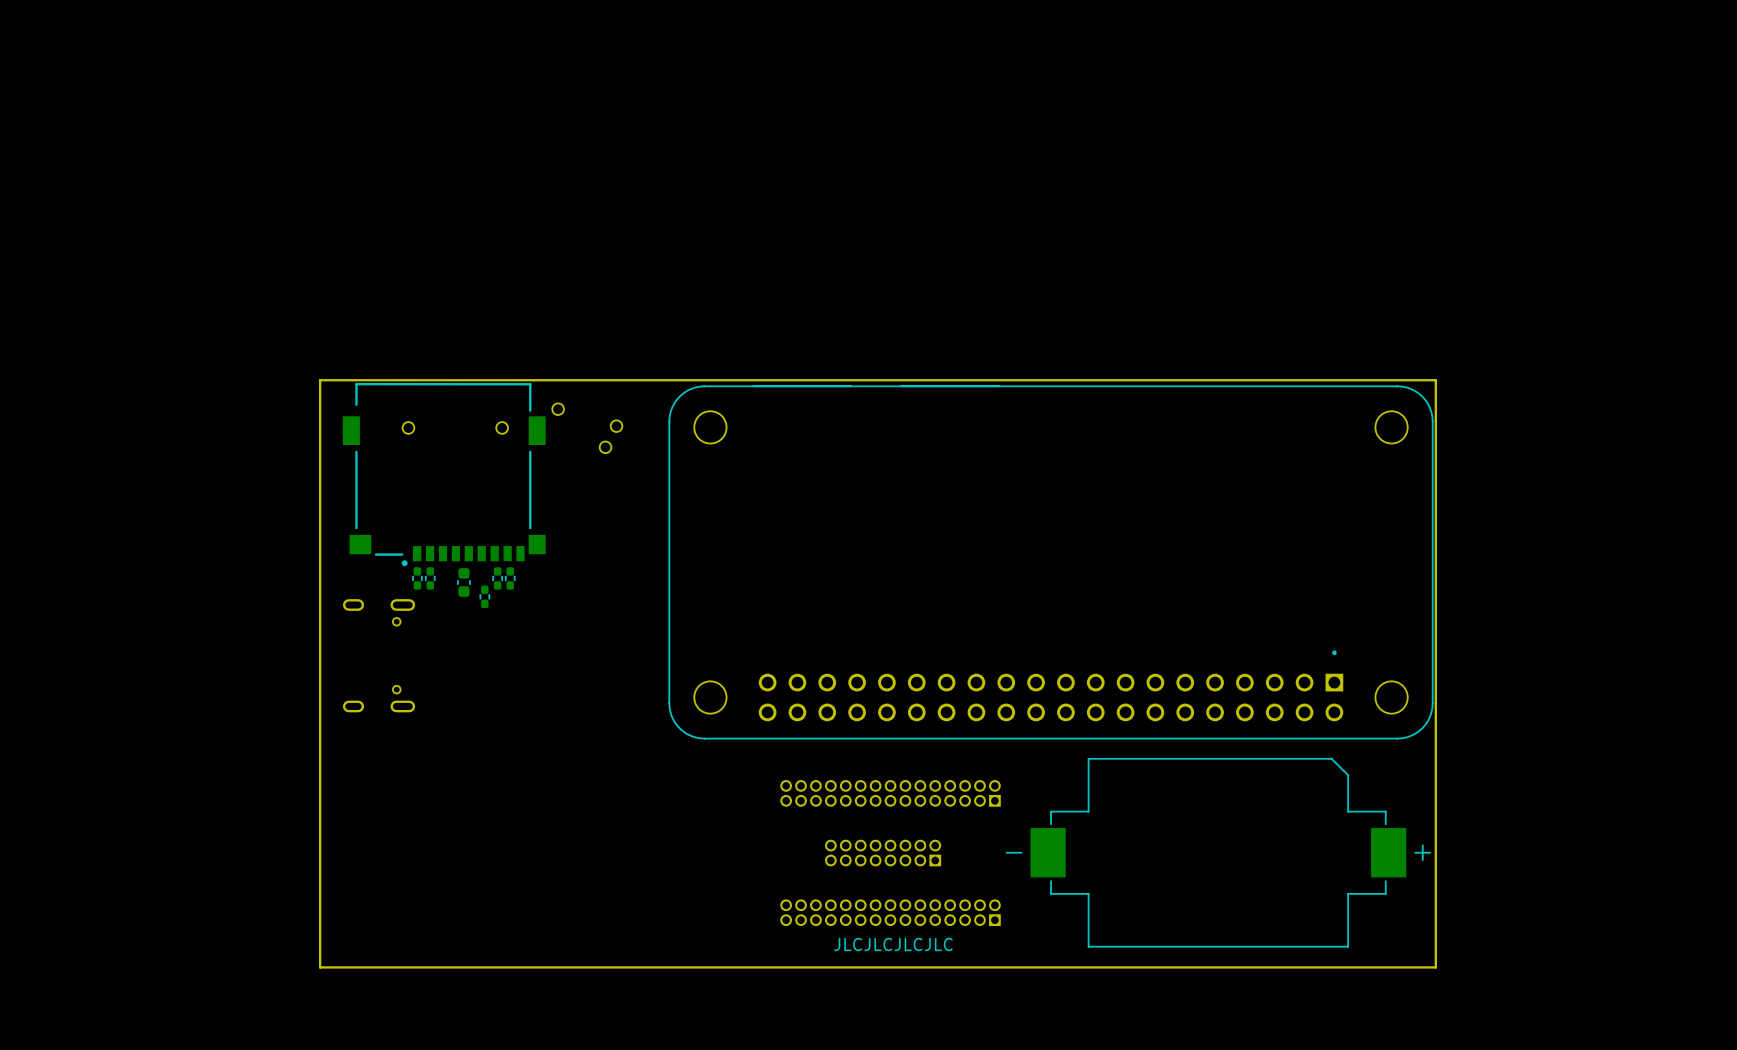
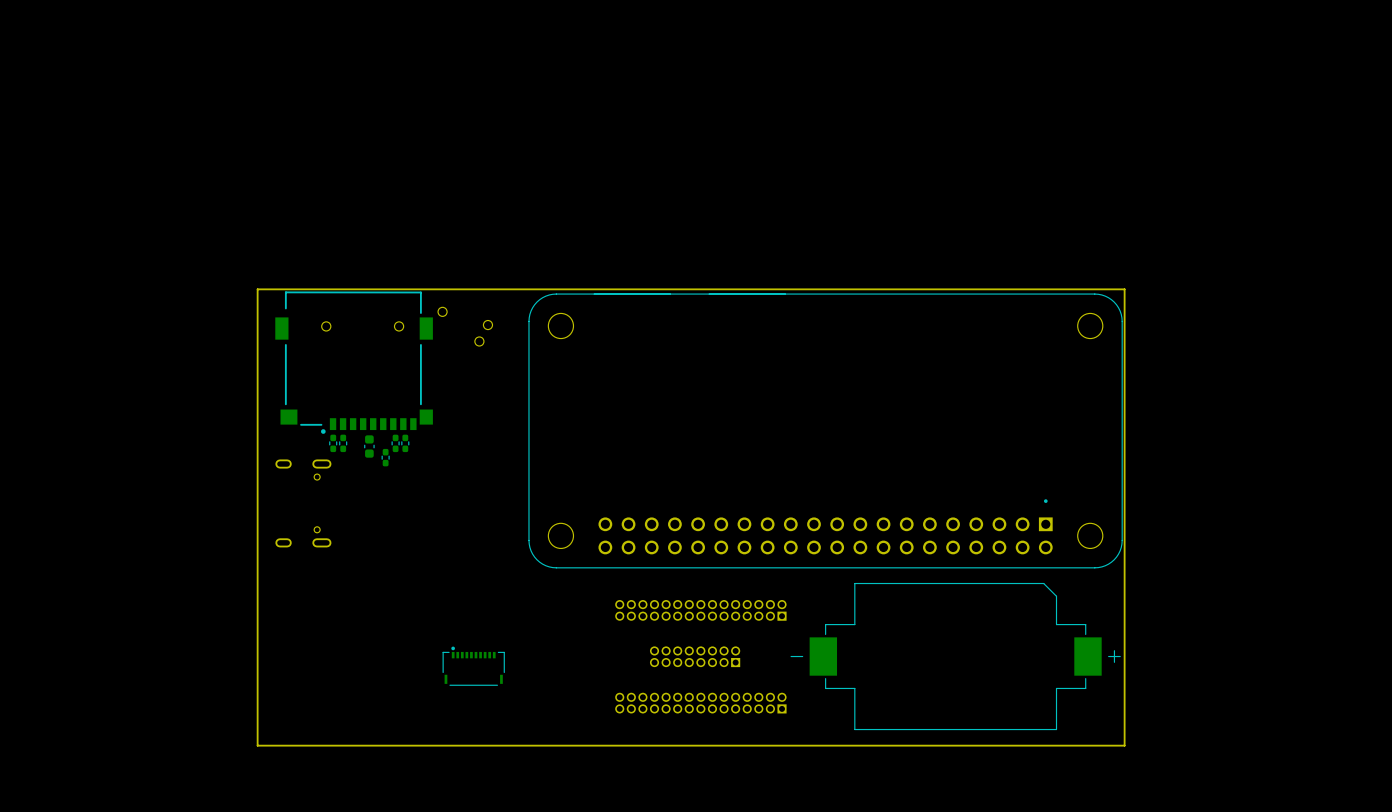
part: none -> (473, 666)
text: JLCJLCJLCJLC (893, 944) -> none

